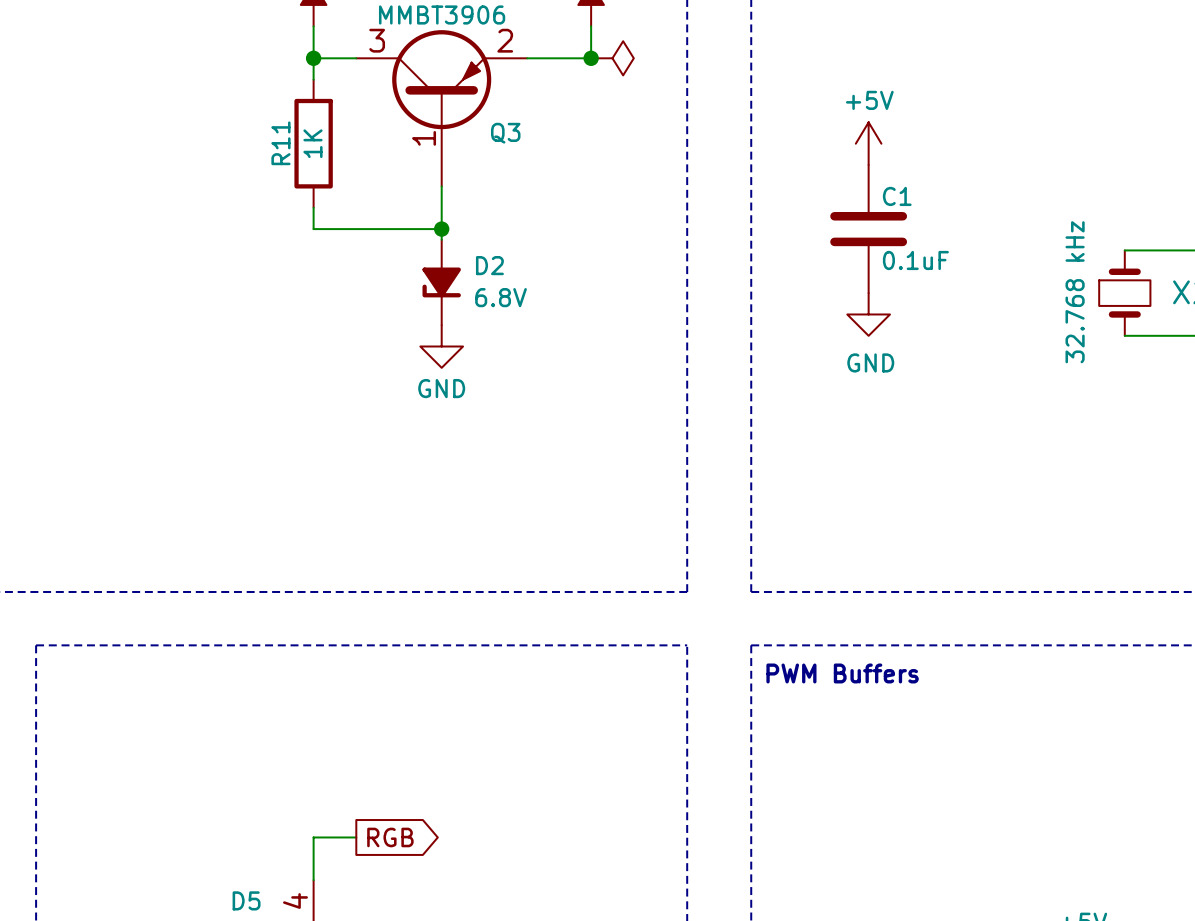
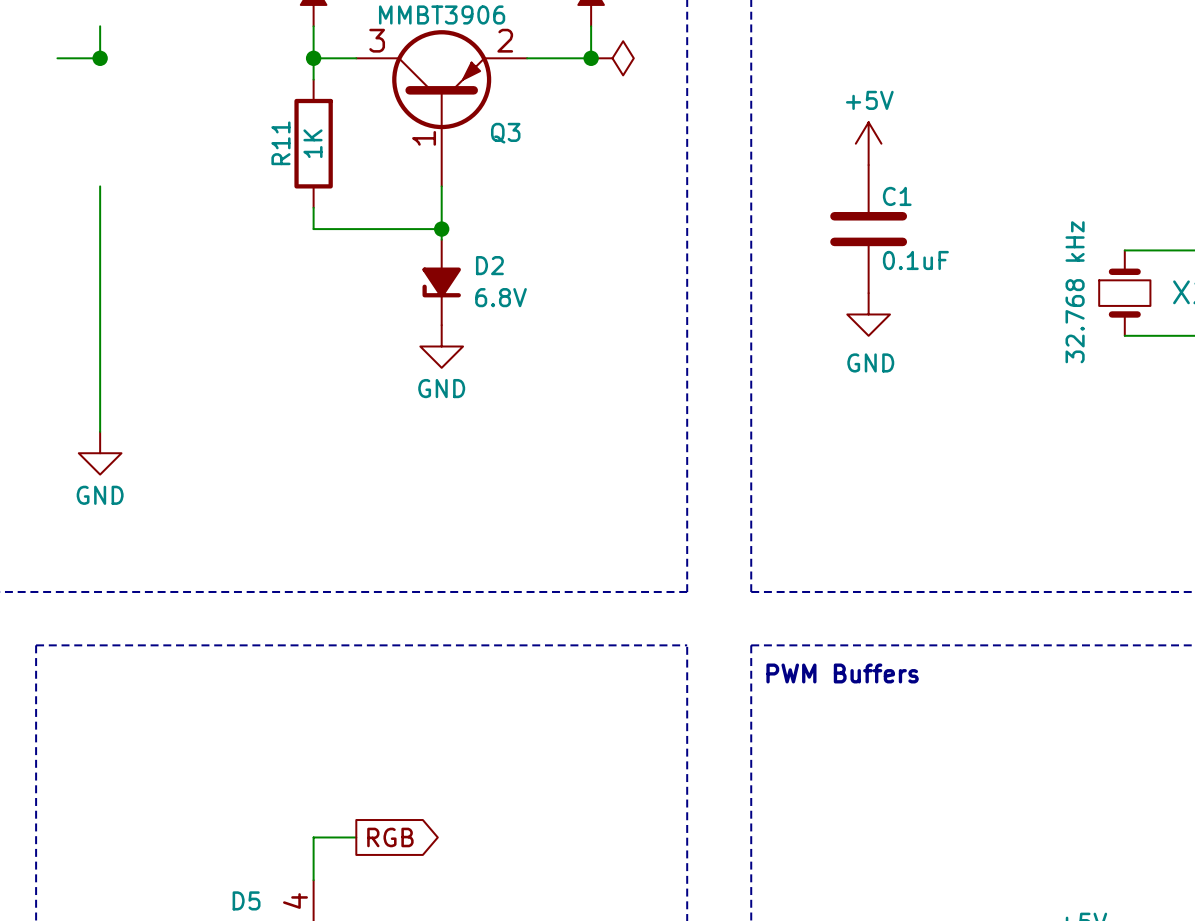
wire: none -> (100, 26) (100, 58) (57, 58)
junction: none -> (100, 58)
wire: none -> (100, 186) (100, 431)
power symbol: none -> GND (100, 453)

